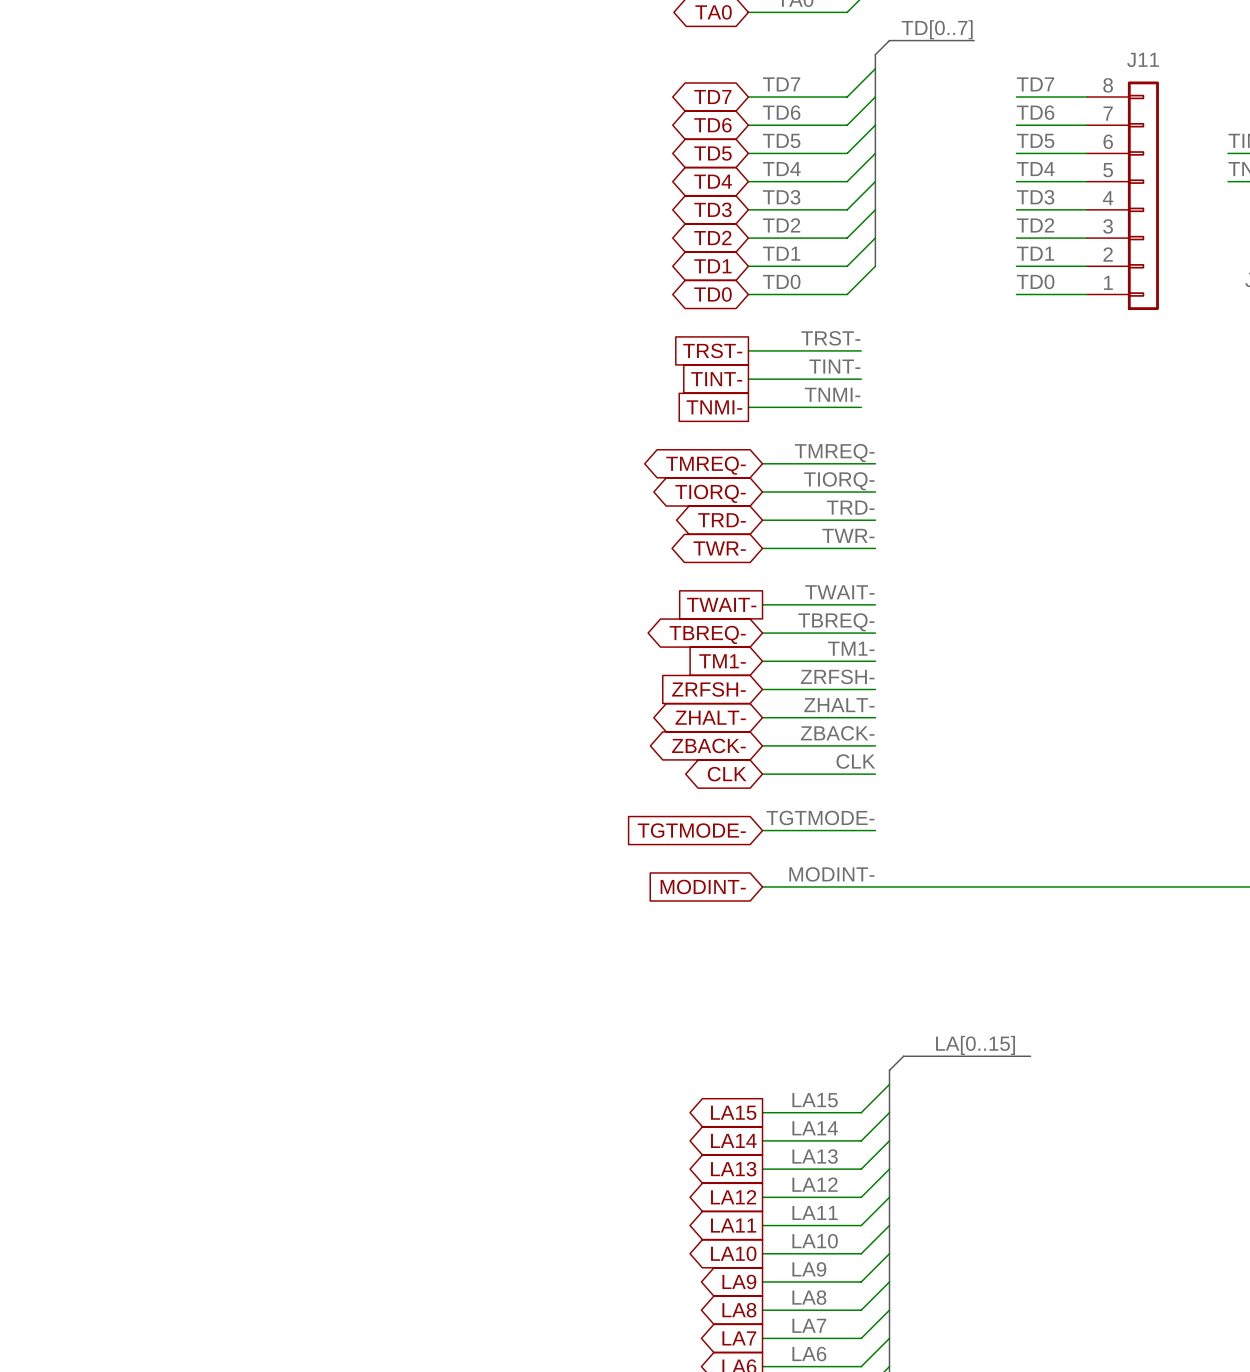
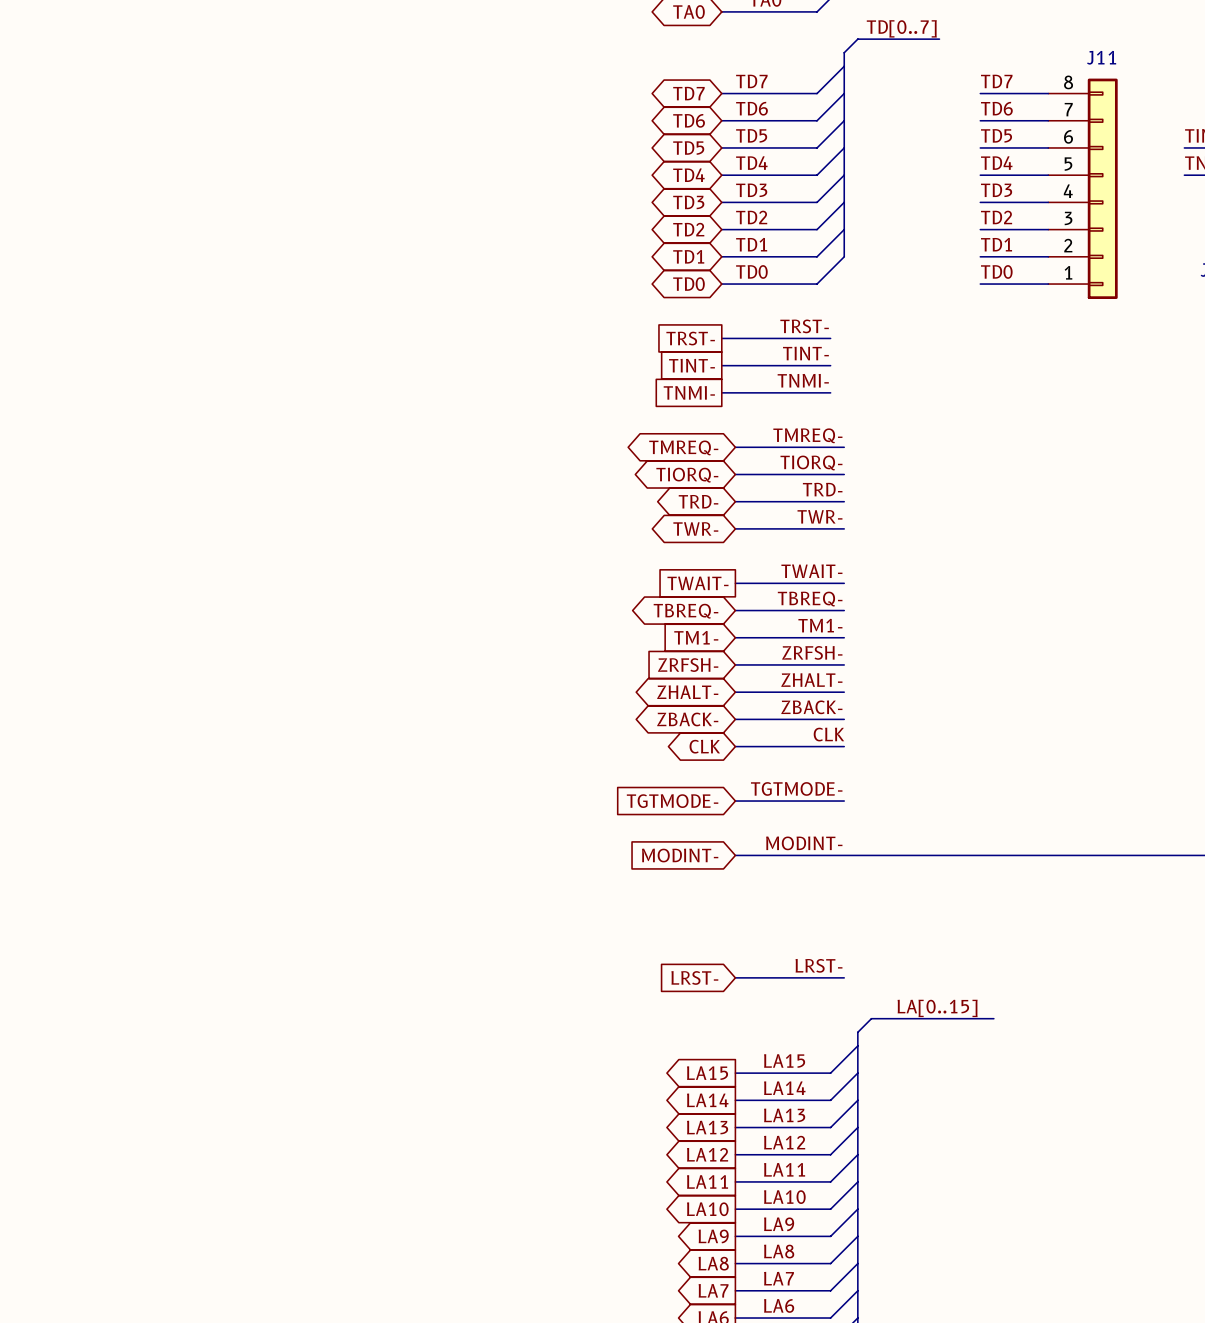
label: none -> LRST- (819, 965)
global label: none -> LRST- (694, 977)
wire: none -> (735, 977) (844, 977)

